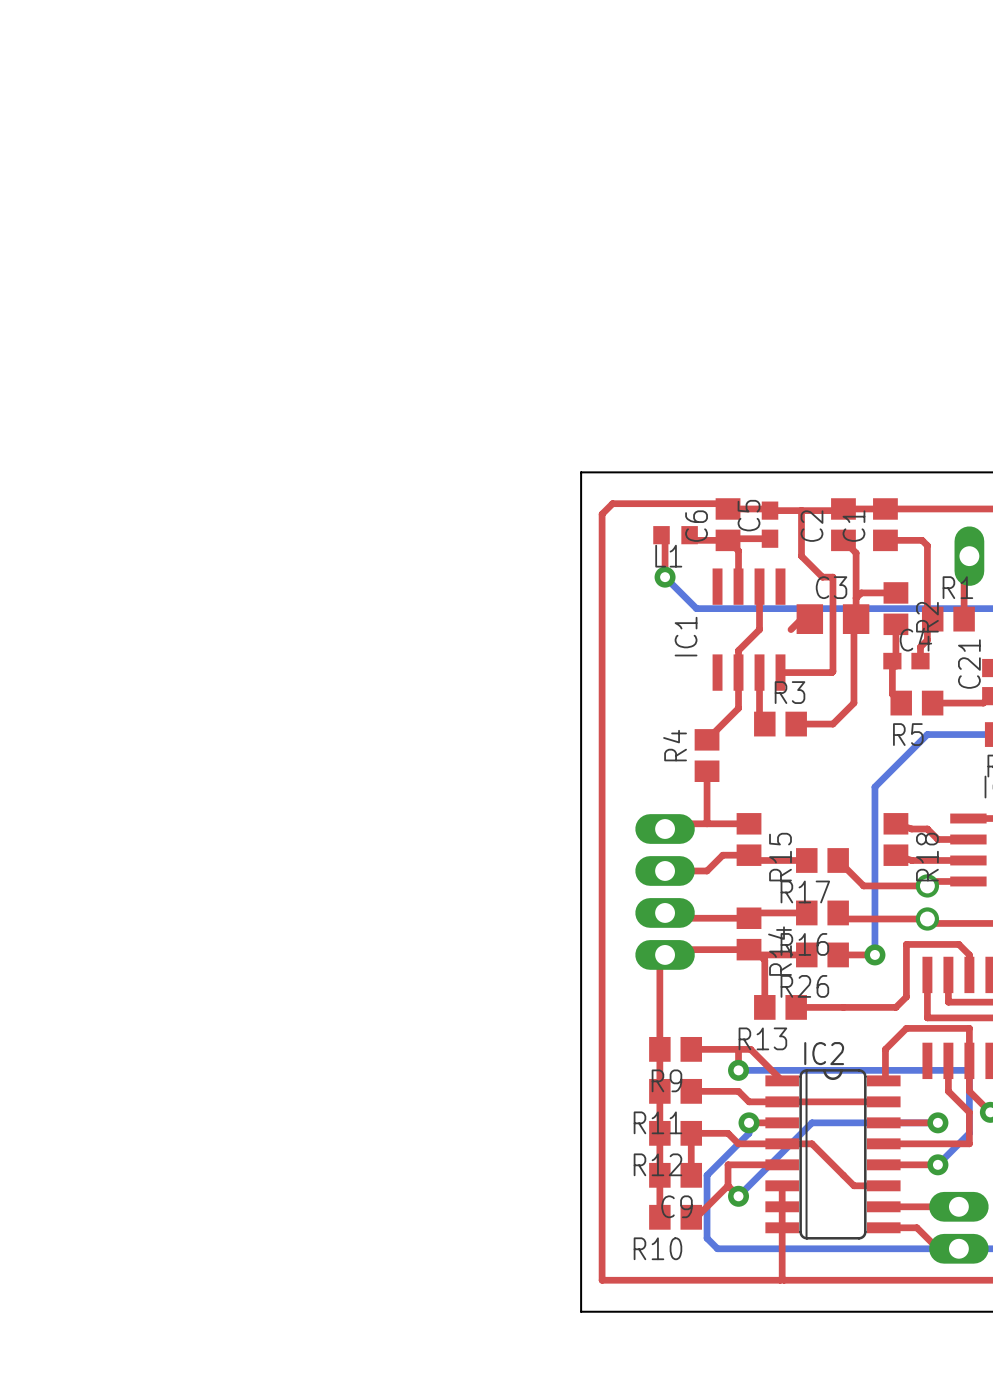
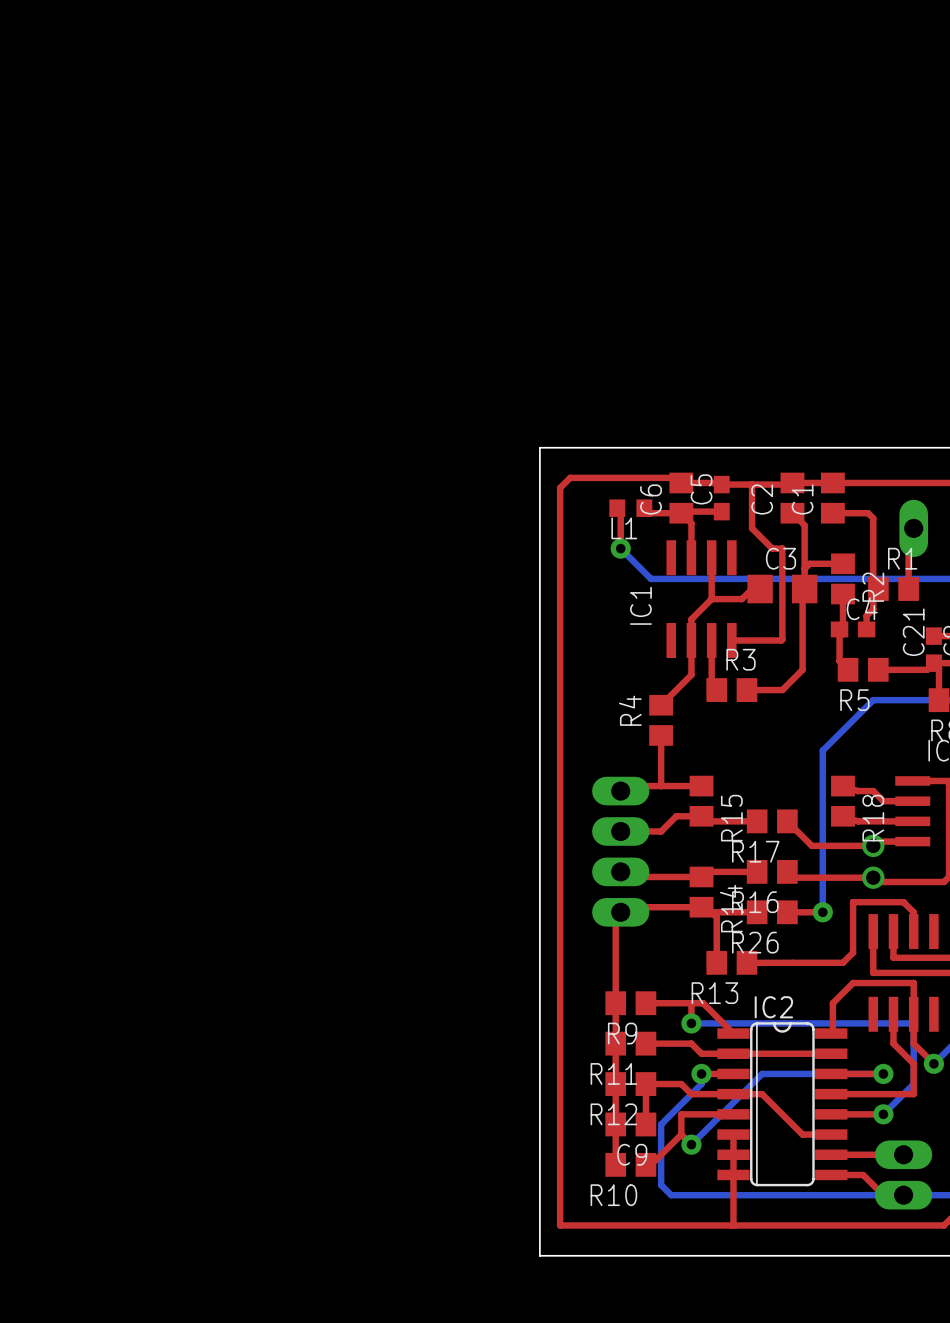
top track: none -> (711, 599) (741, 599)

